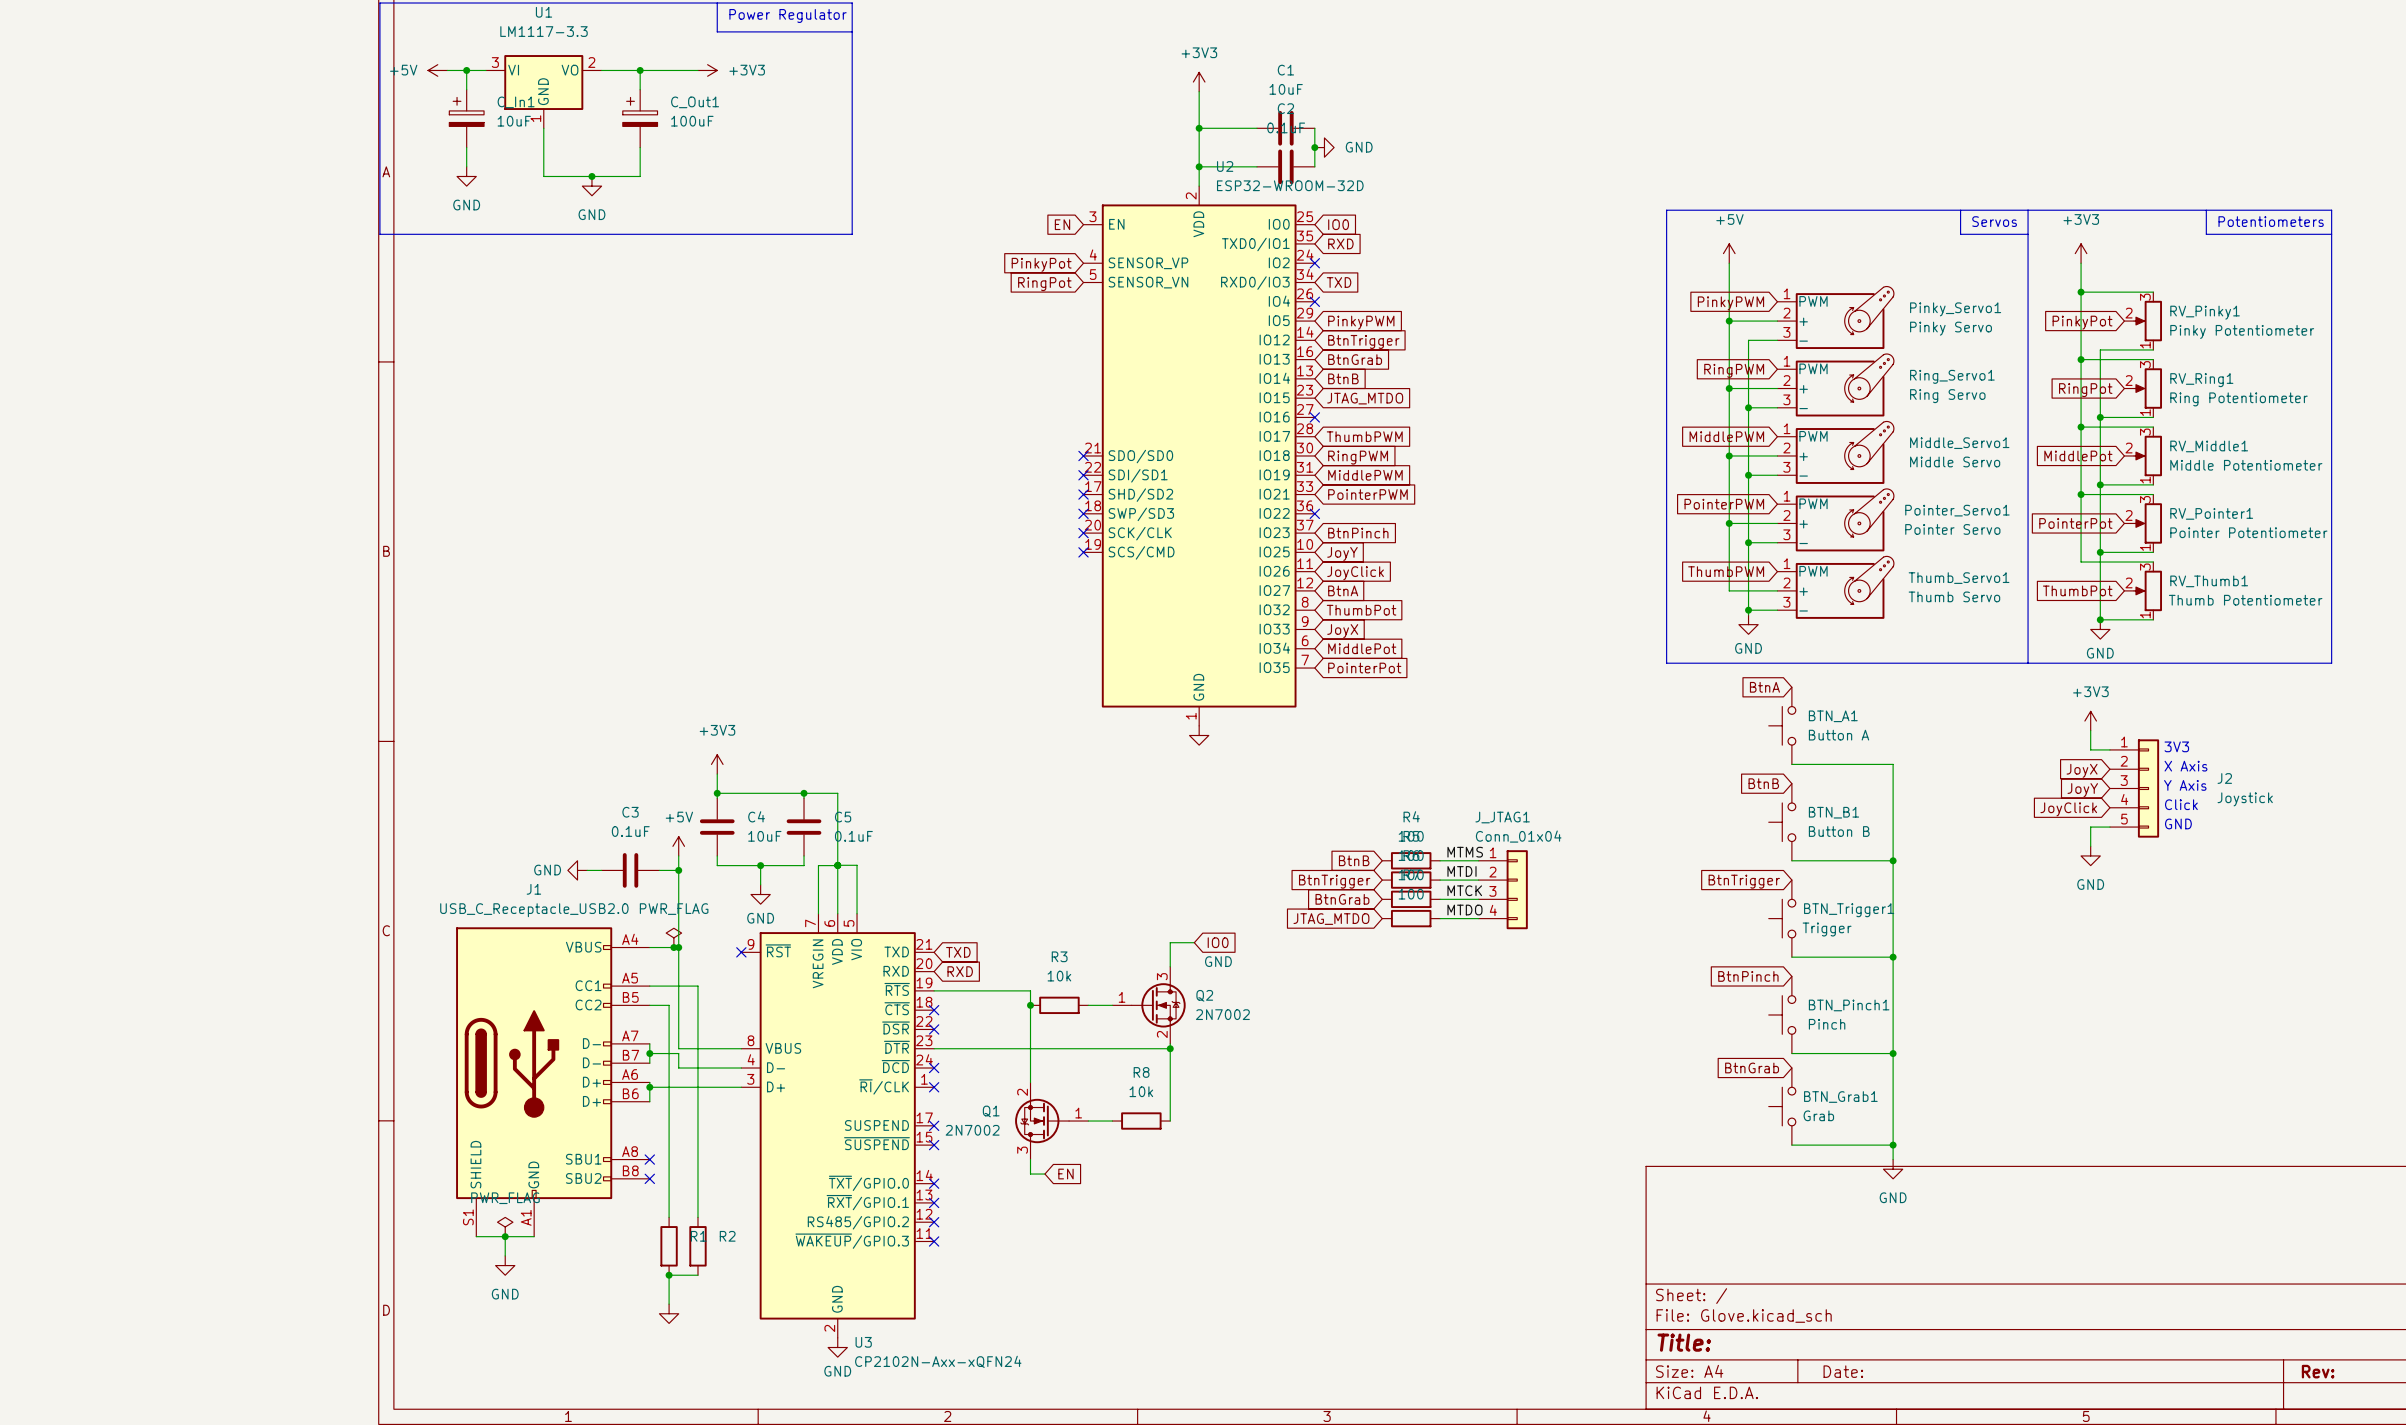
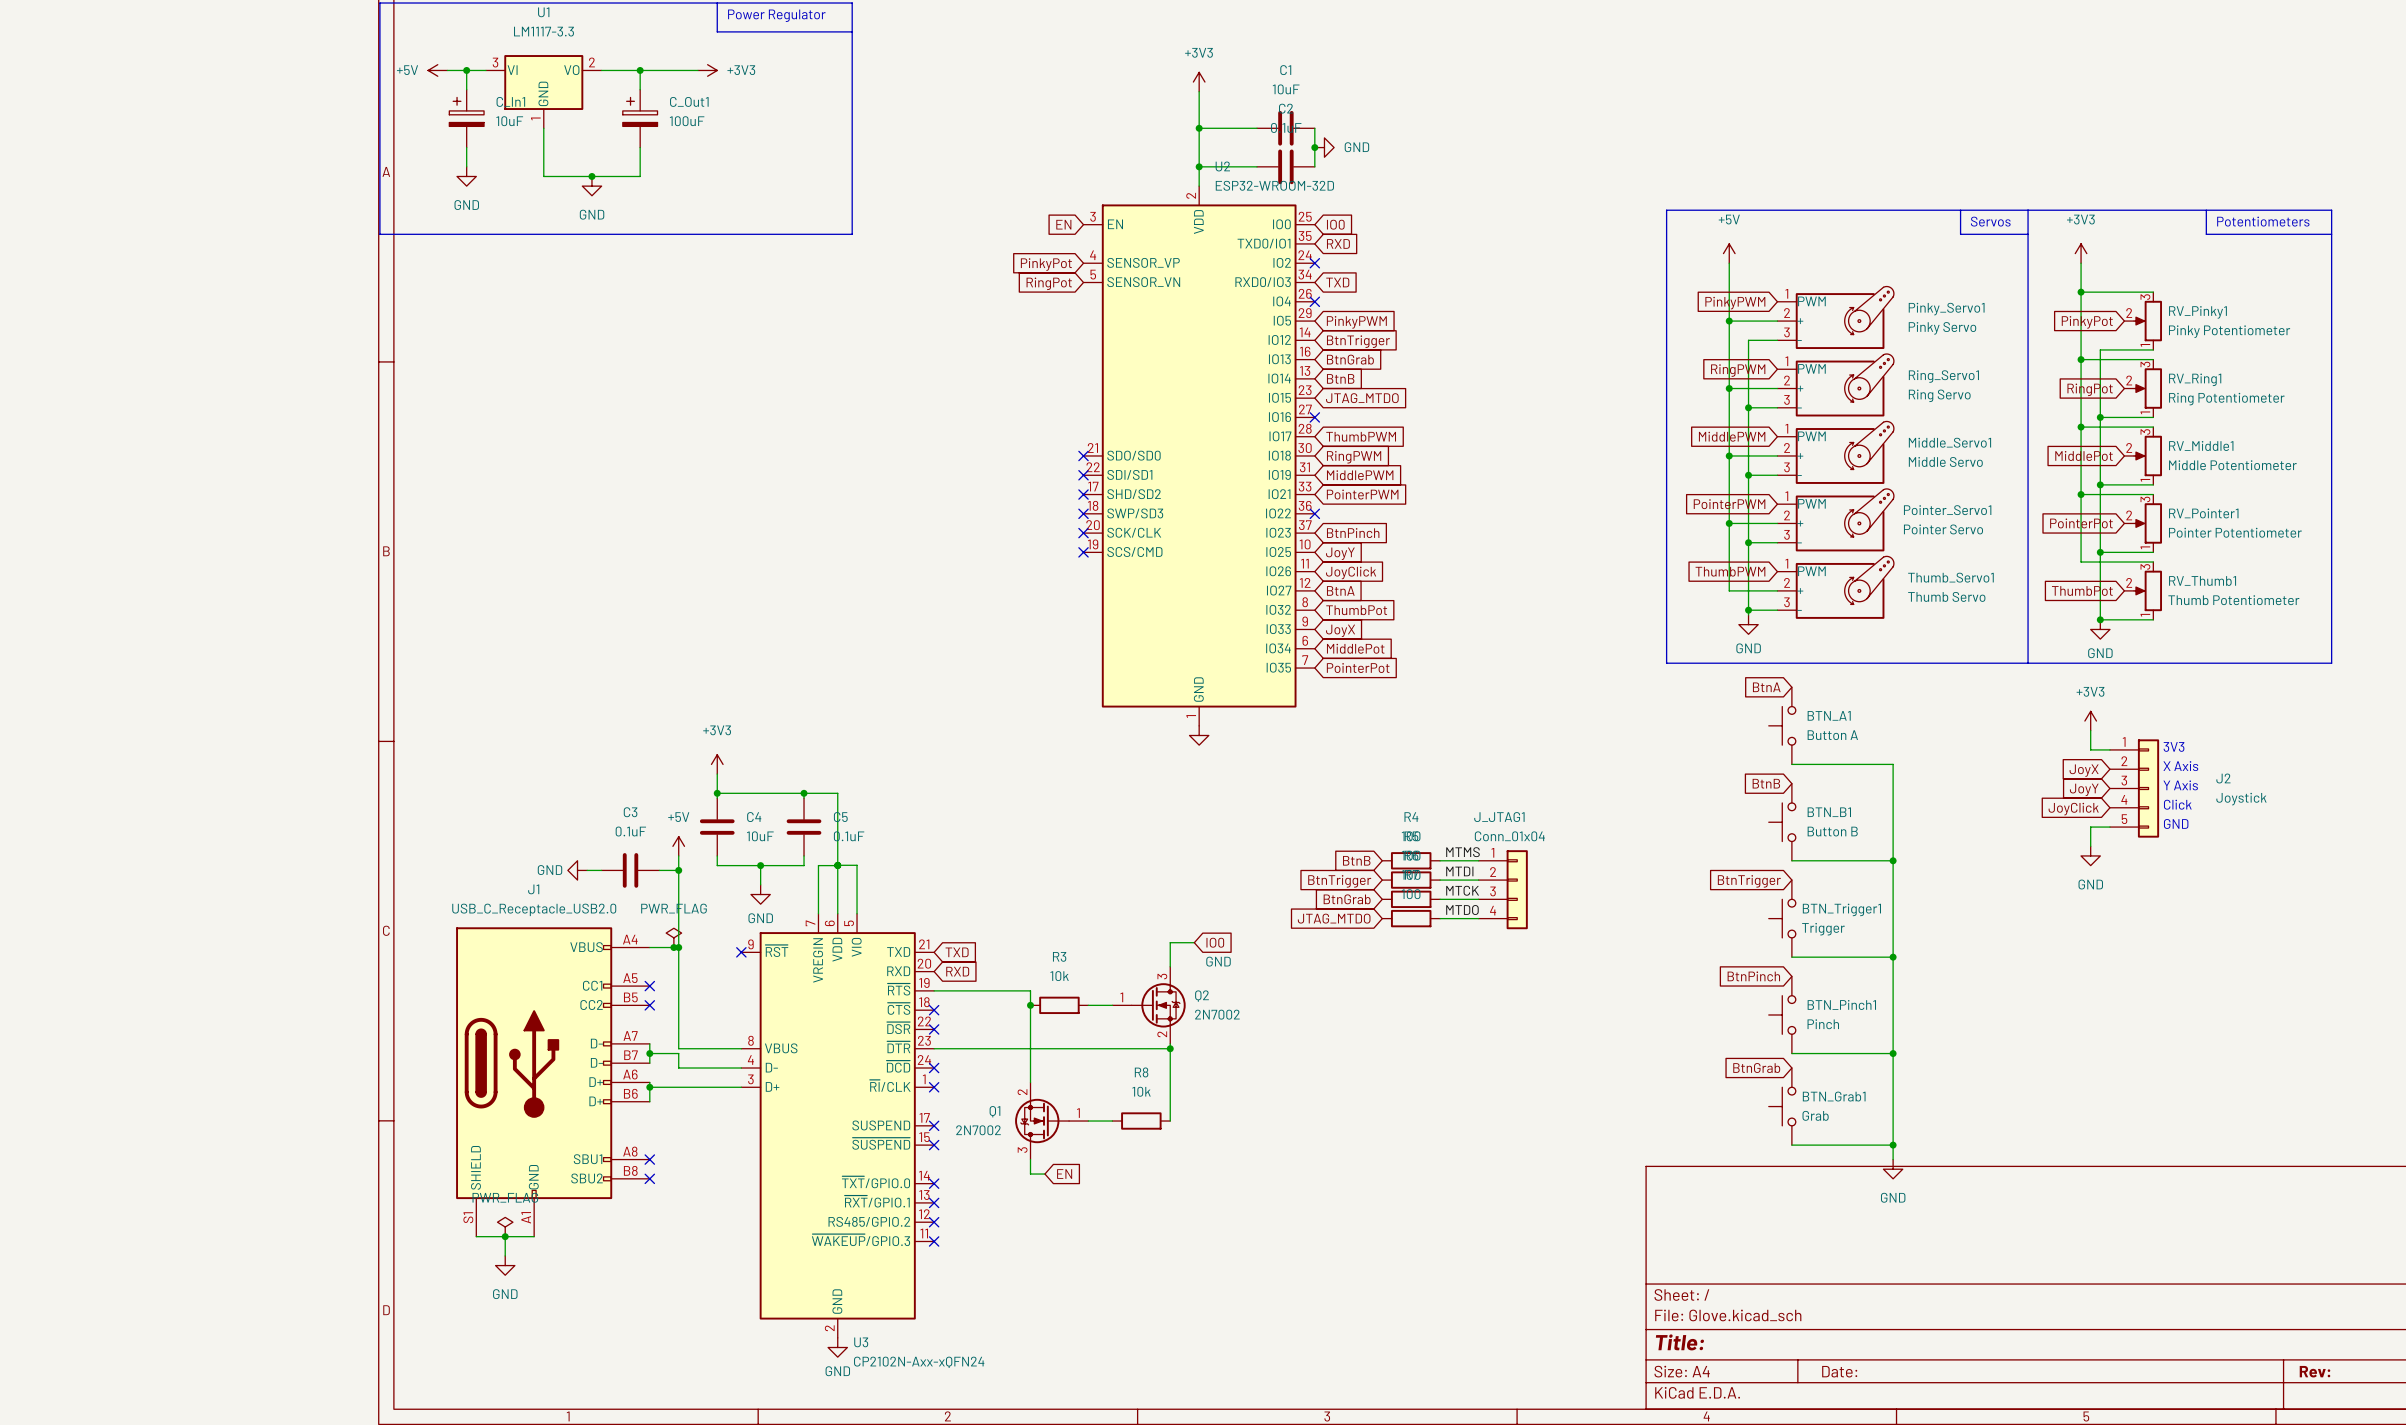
wire: (649, 986) (697, 986) (697, 1217) -> none
no-connect mark: none -> (649, 986)
wire: (649, 1005) (669, 1005) (669, 1217) -> none
no-connect mark: none -> (649, 1005)
R1: (669, 1246) -> none
R2: (697, 1246) -> none
junction: (669, 1275) -> none
wire: (697, 1275) (669, 1275) (669, 1304) -> none
power symbol: (669, 1313) -> none

